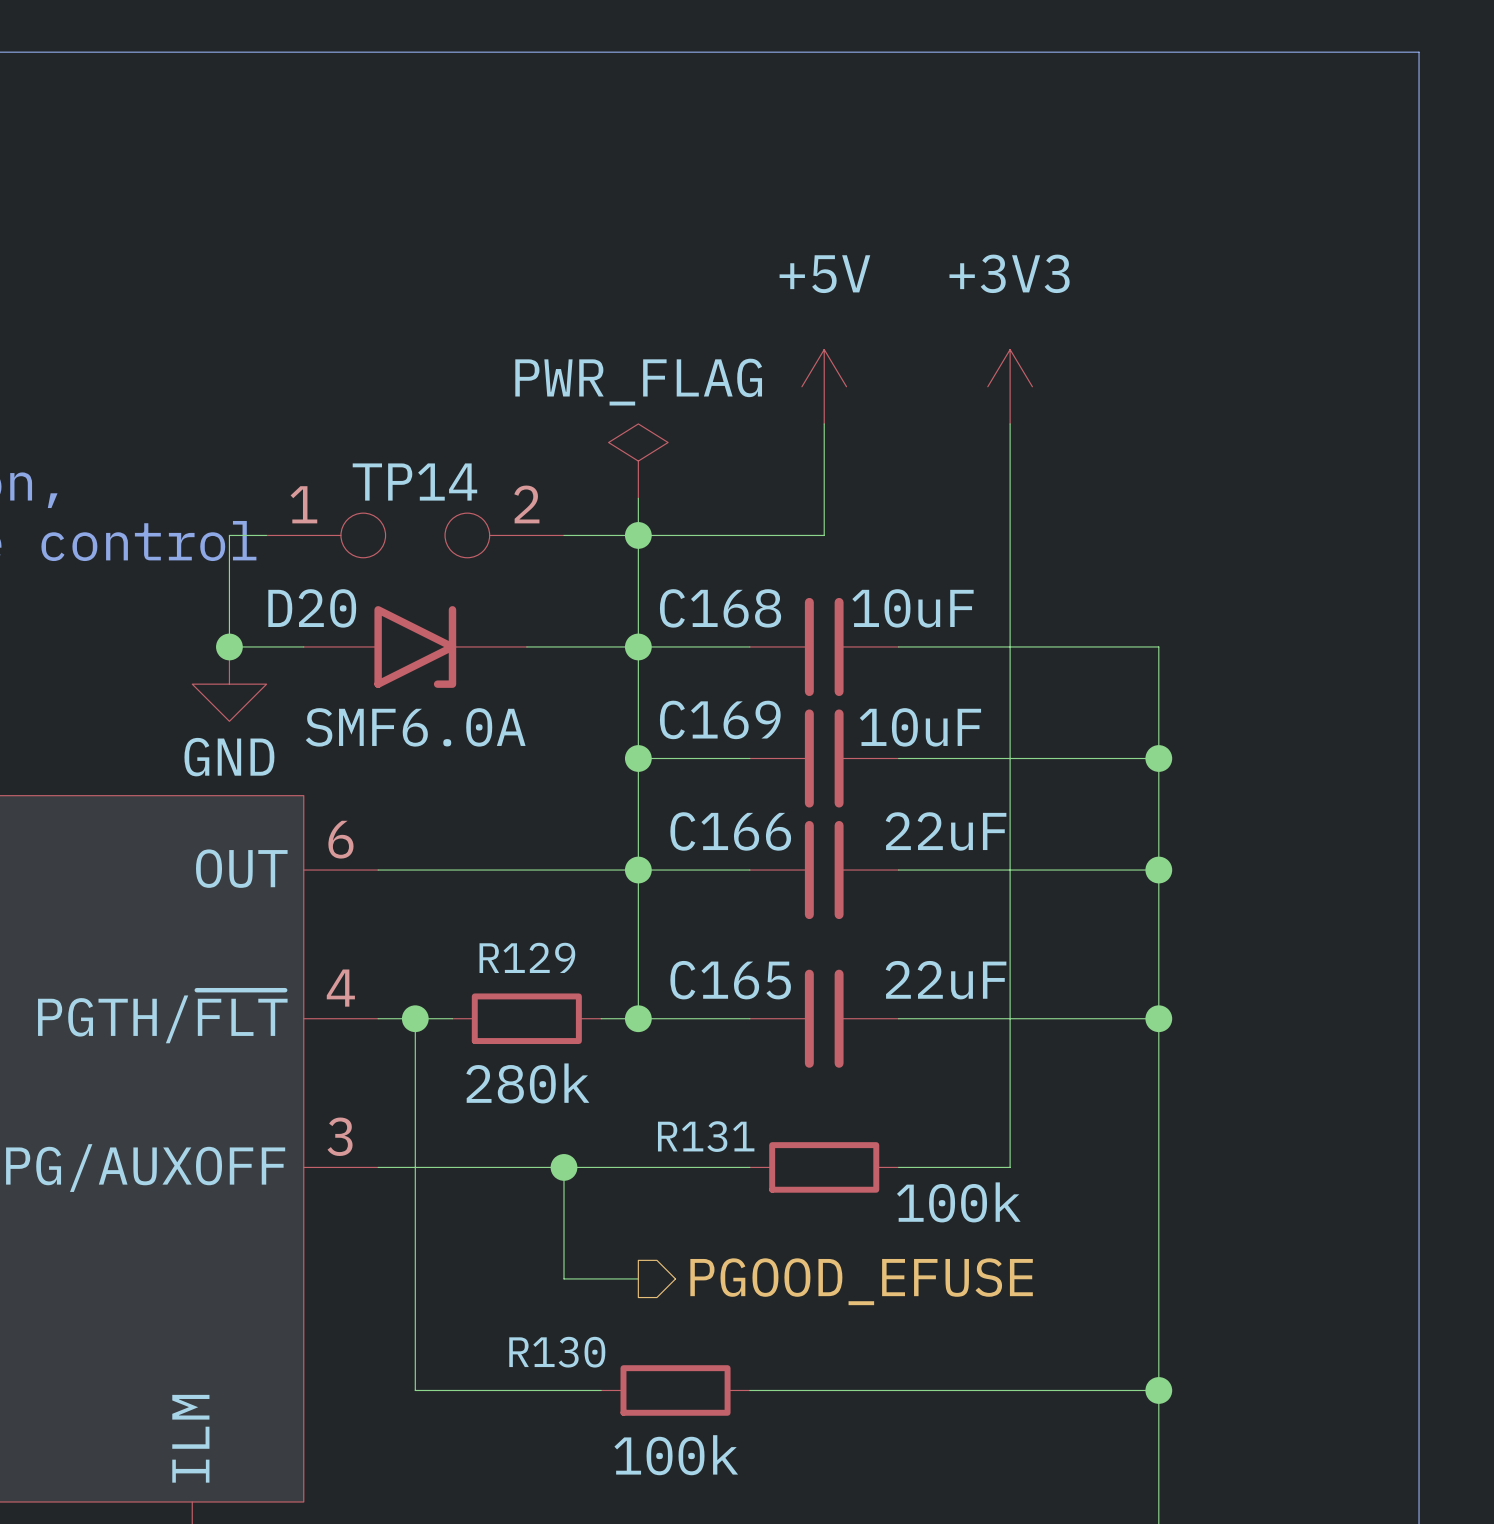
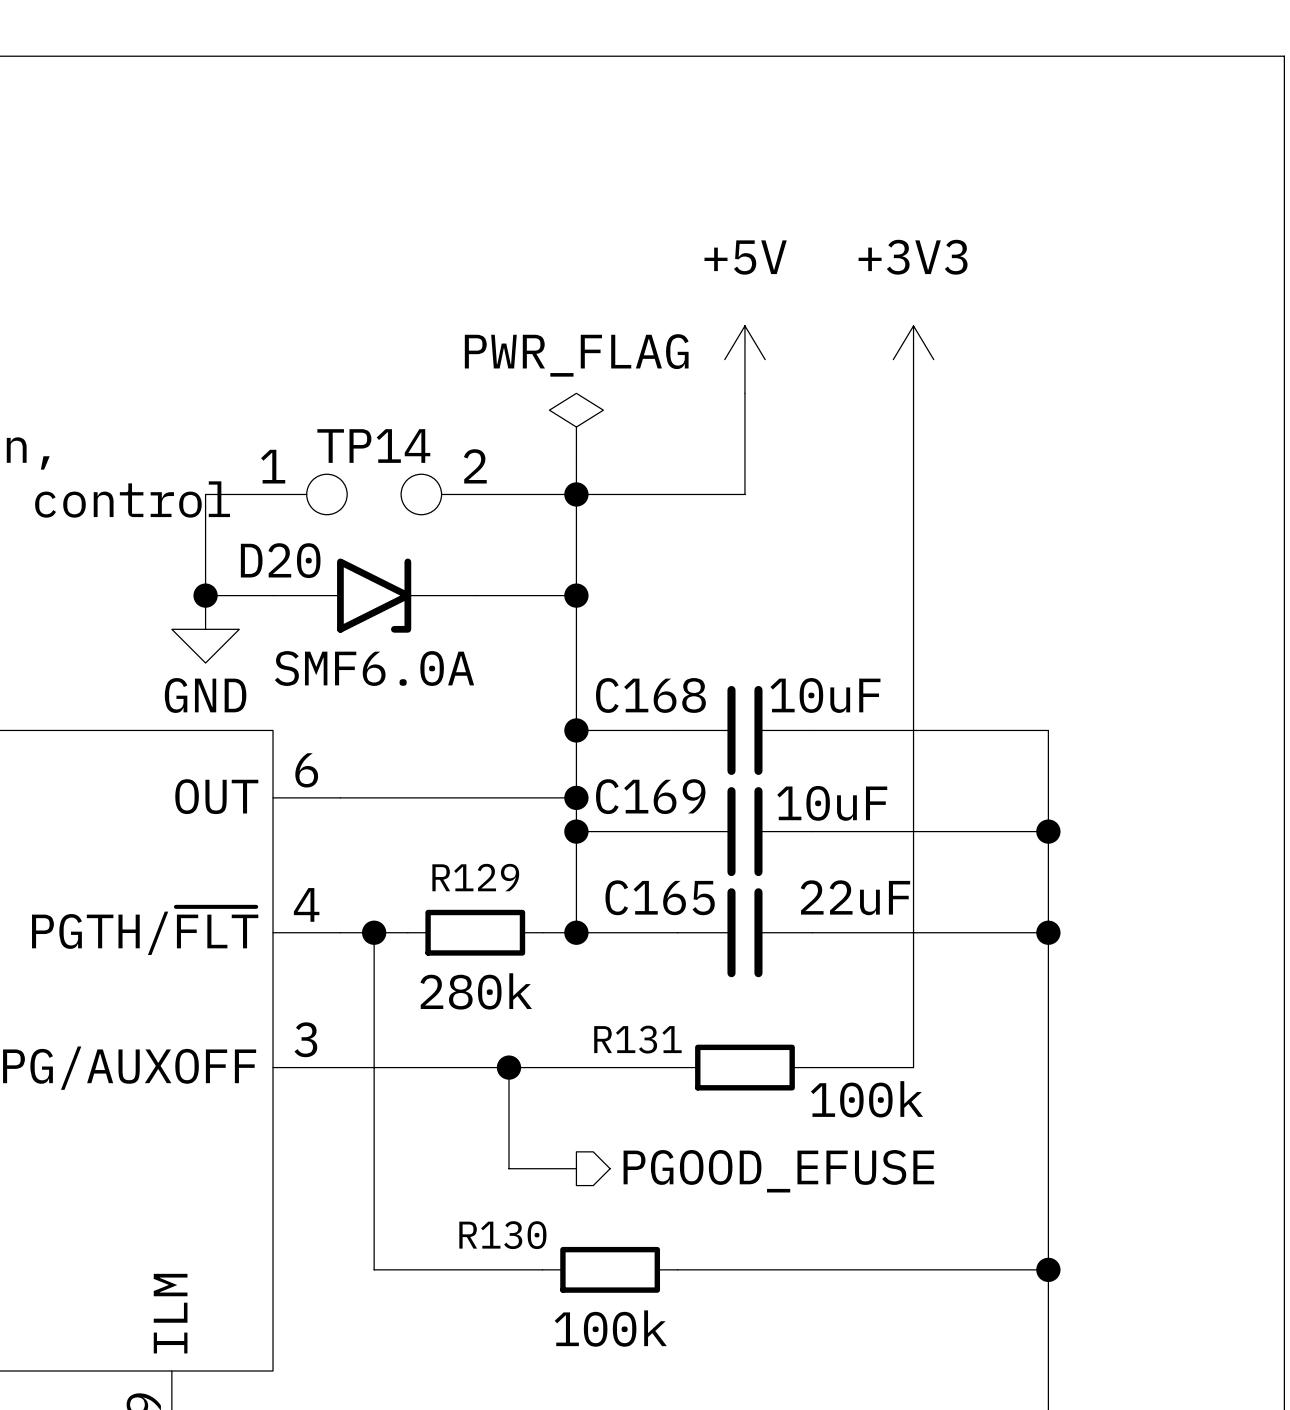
wire: (638, 646) (749, 646) -> none
C168 position: (824, 646) -> (744, 730)
wire: (898, 646) (1158, 646) (1158, 795) -> (812, 730) (1048, 730)
wire: (638, 758) (749, 758) -> (576, 730) (677, 730)
junction position: (638, 758) -> (576, 730)
C169 position: (824, 758) -> (744, 831)
wire: (898, 758) (1158, 758) -> none
junction: (1158, 758) -> none
wire: (638, 870) (749, 870) -> (576, 831) (677, 831)
C166: 22uF (824, 870) -> none
wire: (898, 870) (1158, 870) -> (812, 831) (1048, 831)
junction position: (1158, 870) -> (1048, 831)
junction: none -> (576, 831)

